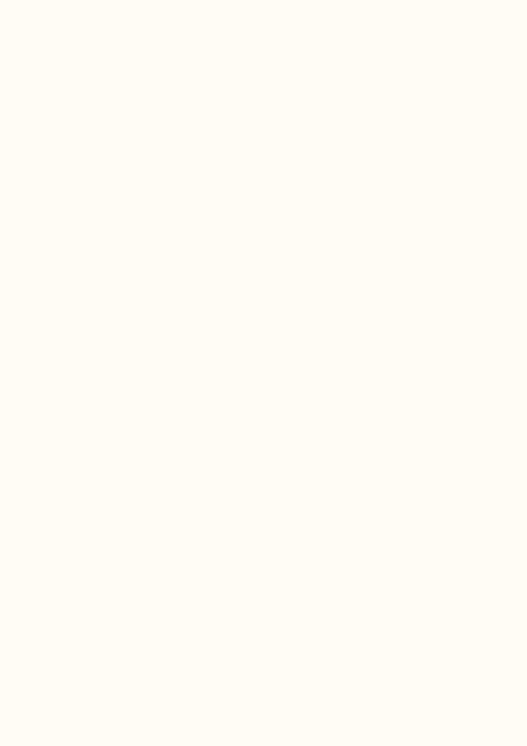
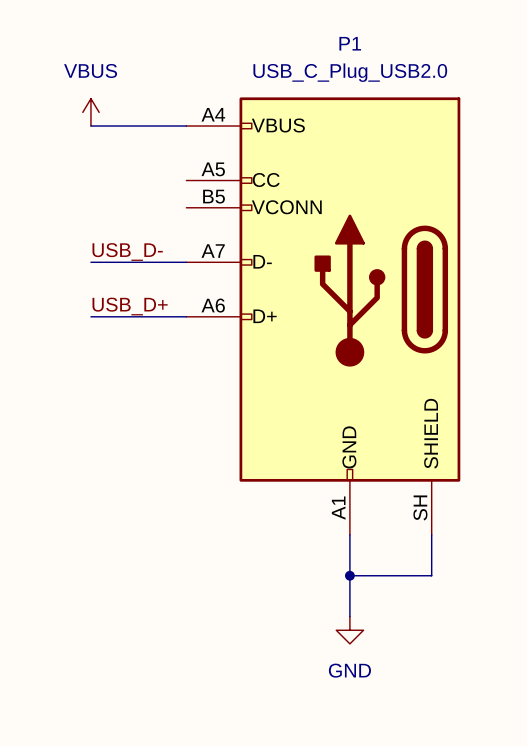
power symbol: none -> VBUS (90, 112)
wire: none -> (90, 126) (186, 126)
label: none -> USB_D- (127, 252)
wire: none -> (90, 262) (186, 262)
label: none -> USB_D+ (130, 306)
wire: none -> (90, 316) (186, 316)
P1: none -> USB_C_Plug_USB2.0 (323, 316)
wire: none -> (349, 534) (349, 616)
wire: none -> (431, 534) (431, 575) (349, 575)
junction: none -> (349, 575)
power symbol: none -> GND (349, 630)

